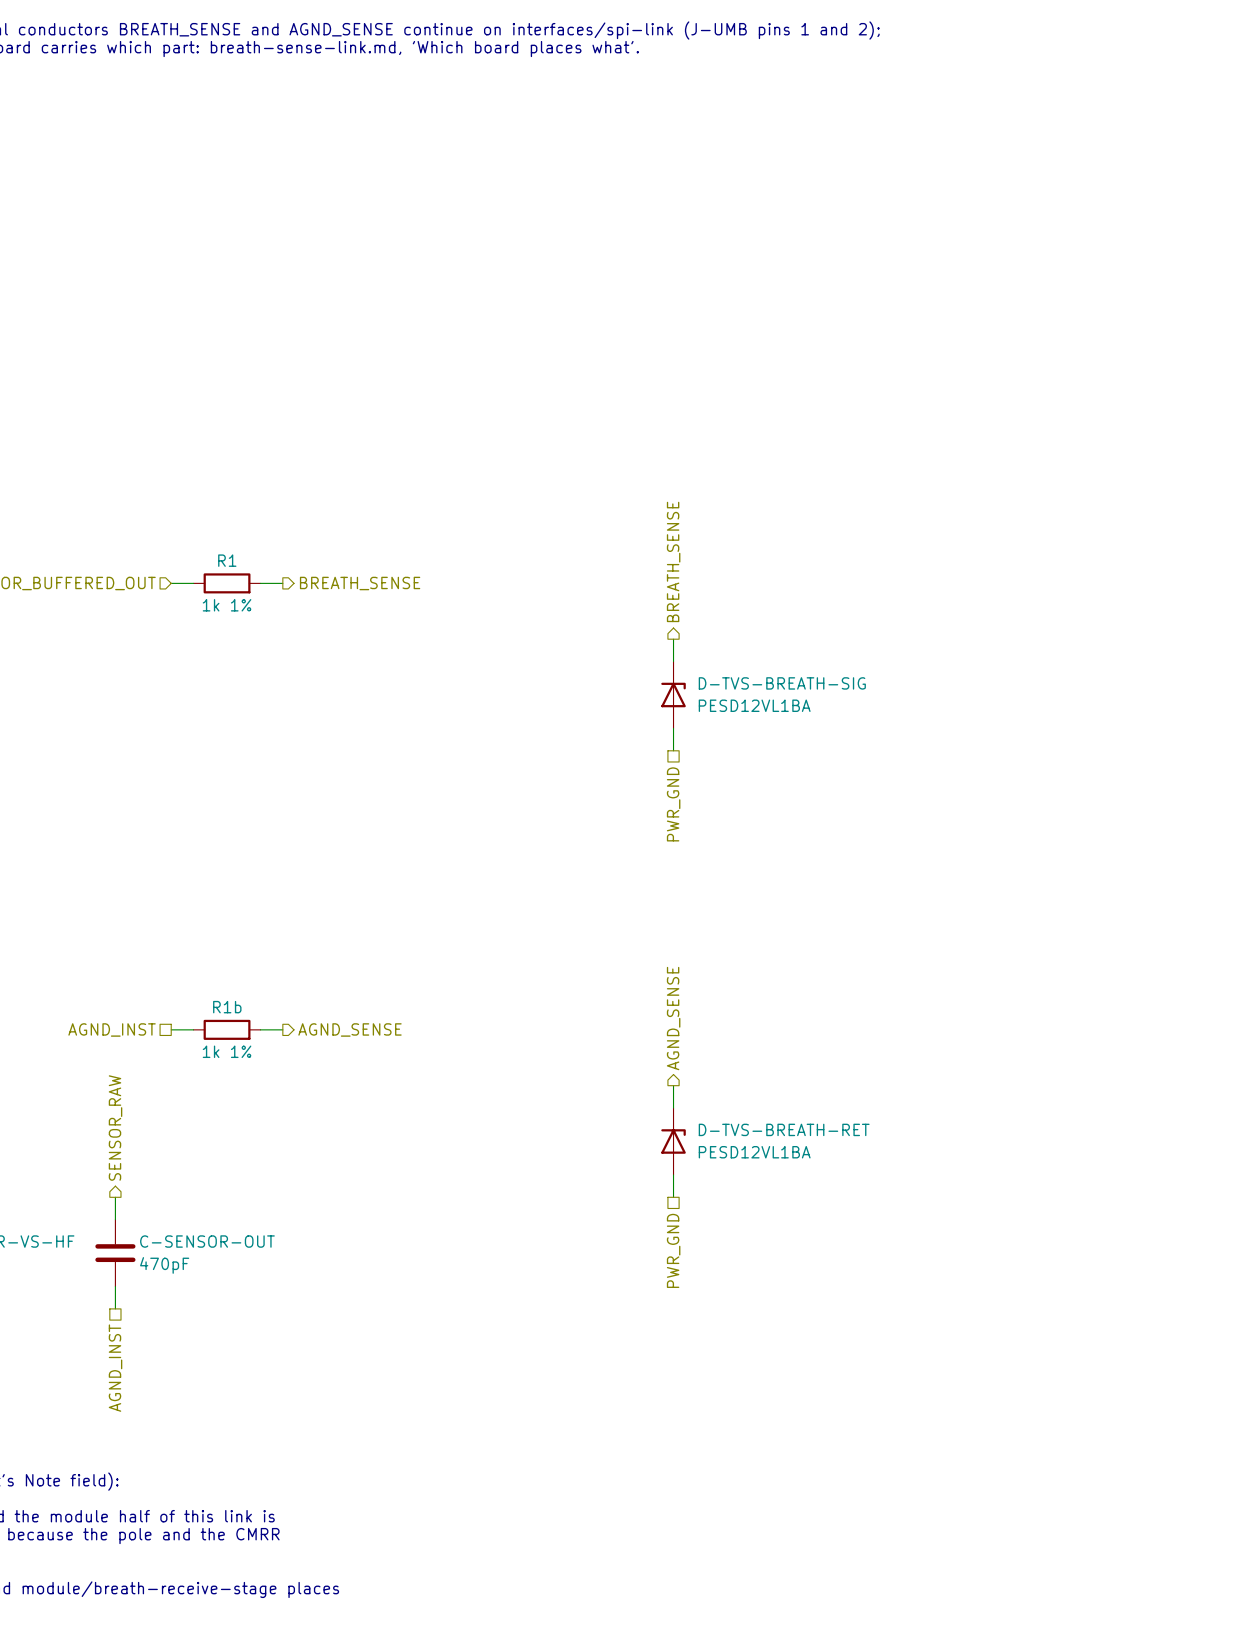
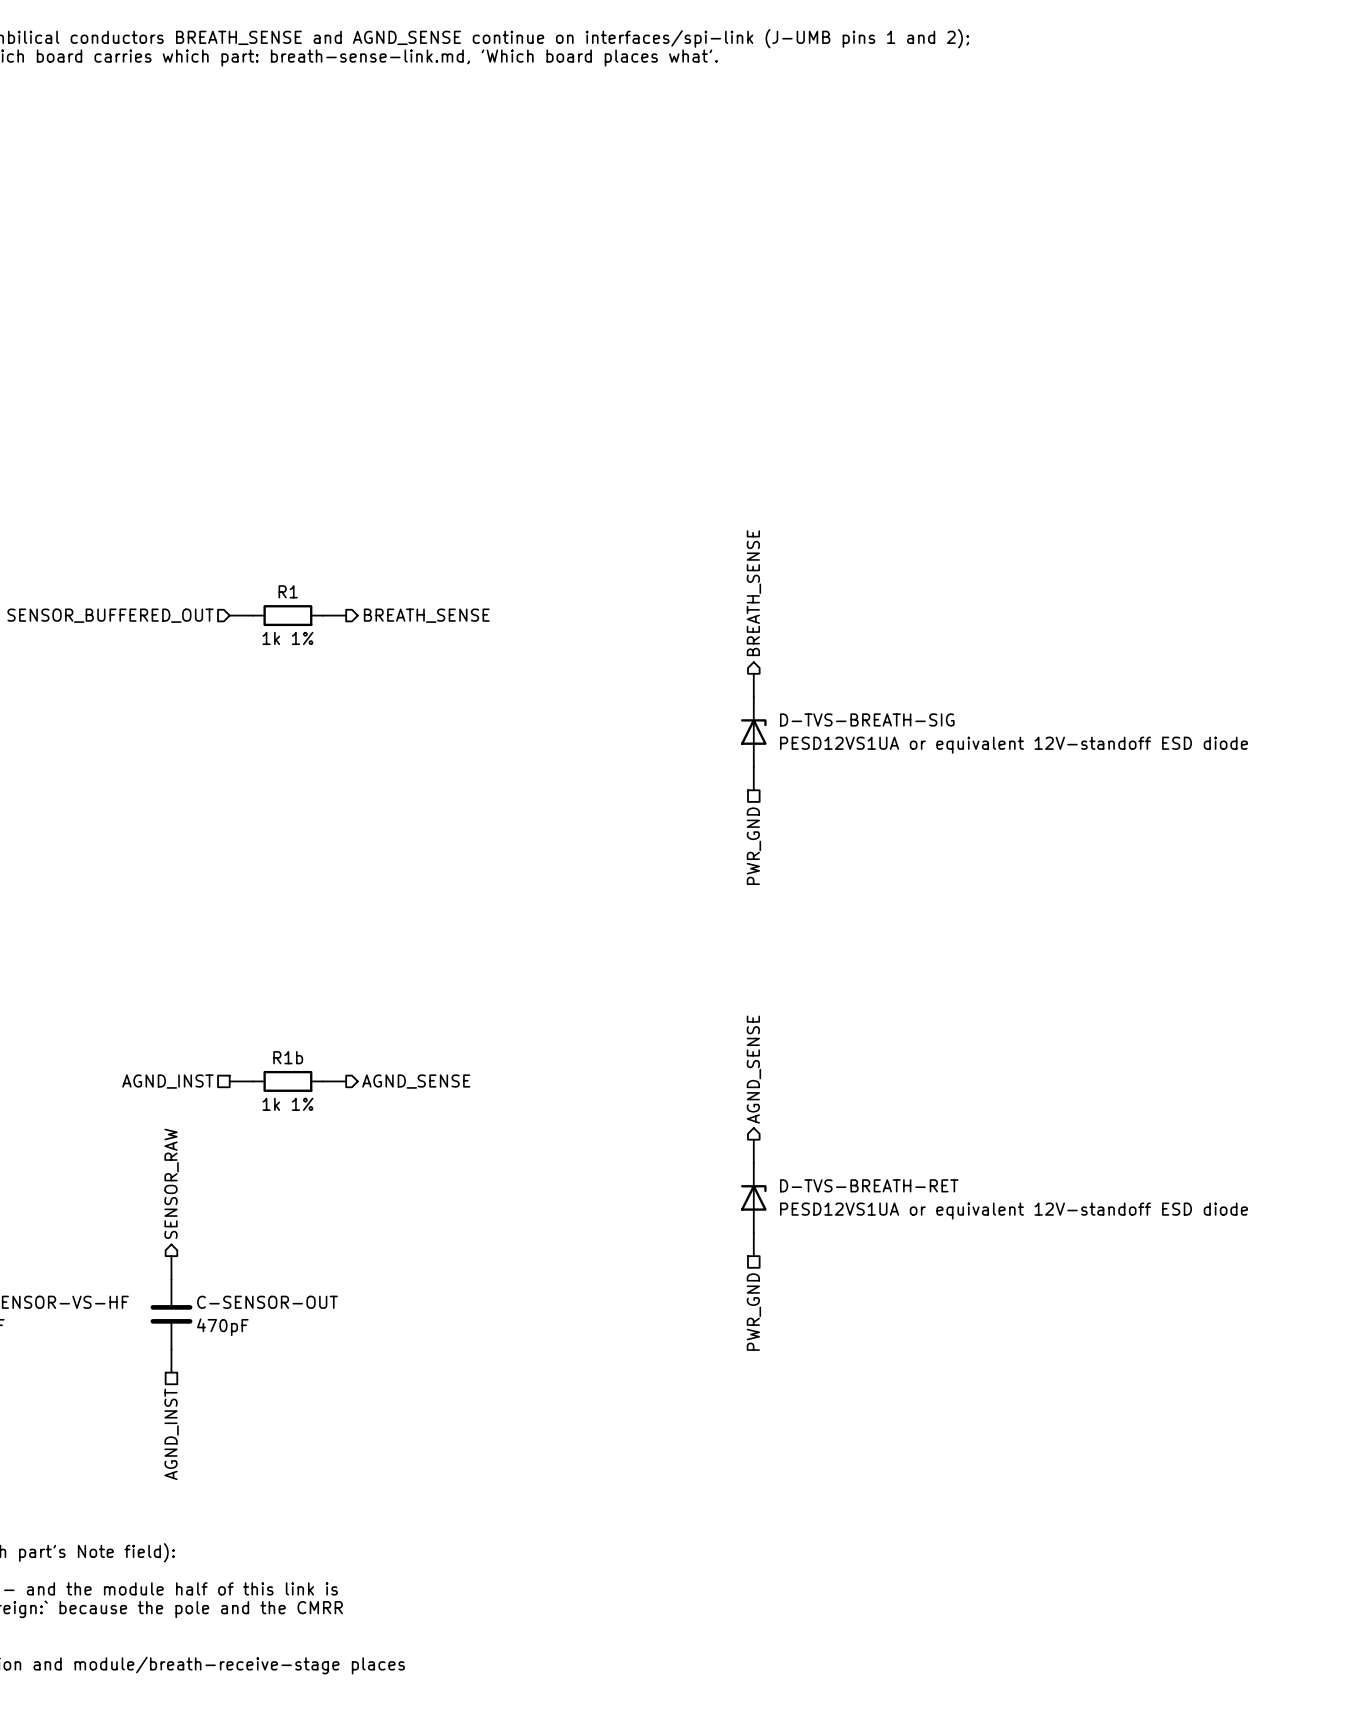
D-TVS-BREATH-SIG value: PESD12VL1BA (754, 705) -> PESD12VS1UA or equivalent 12V-standoff ESD diode (1013, 745)
D-TVS-BREATH-RET value: PESD12VL1BA (754, 1152) -> PESD12VS1UA or equivalent 12V-standoff ESD diode (1013, 1211)

